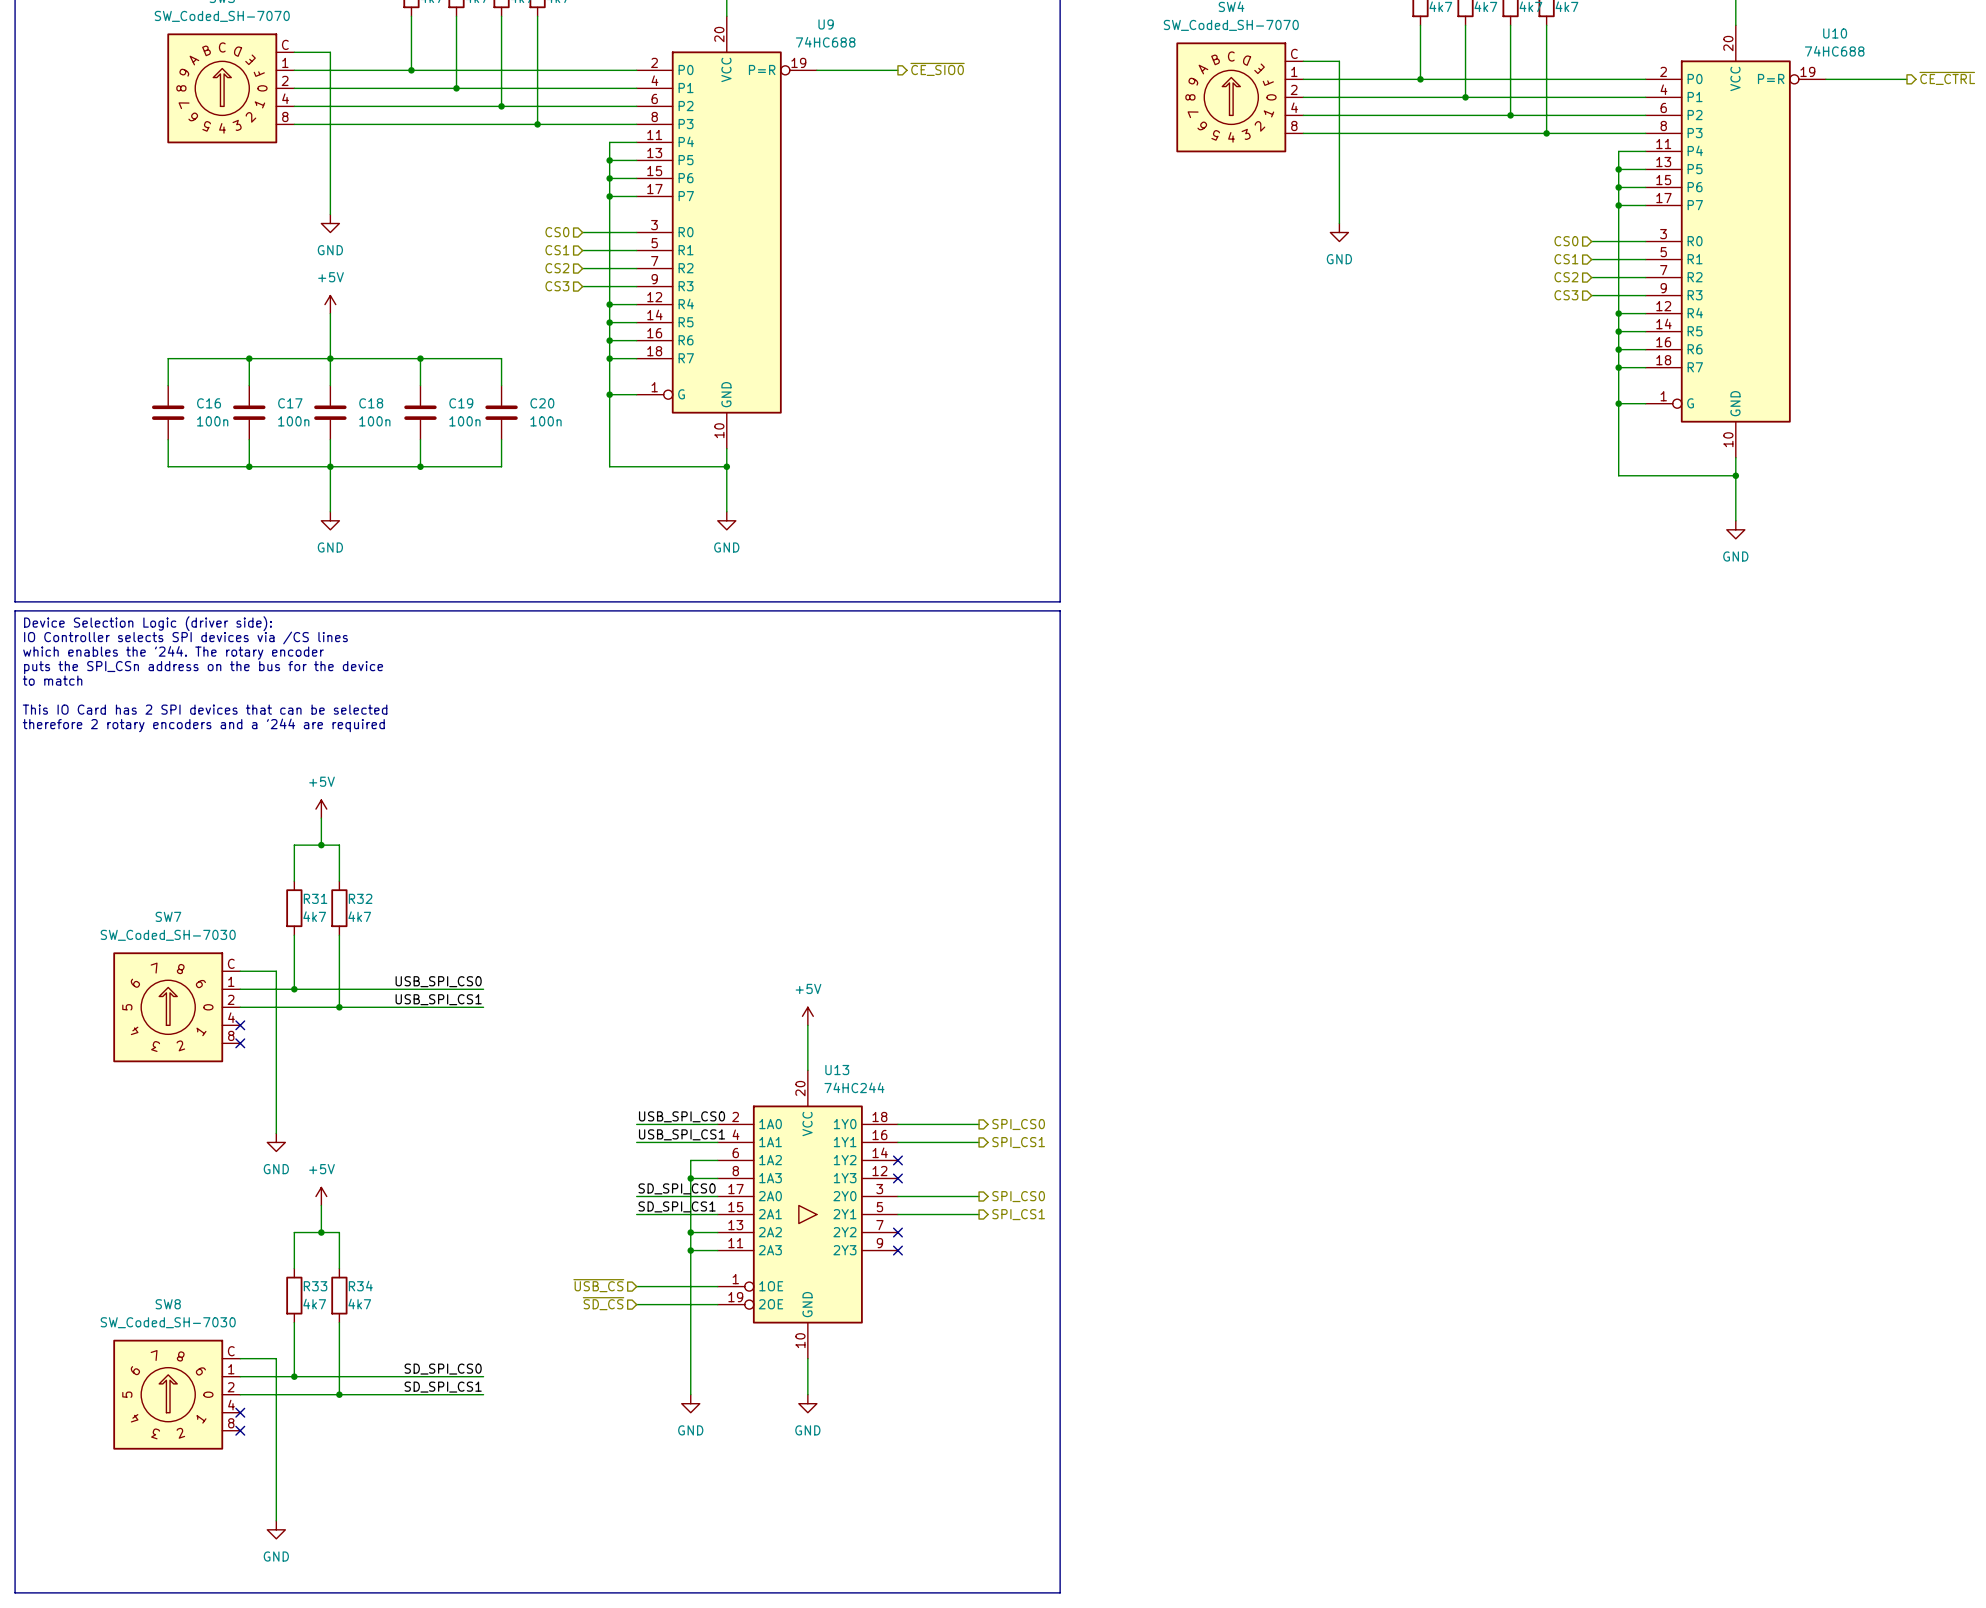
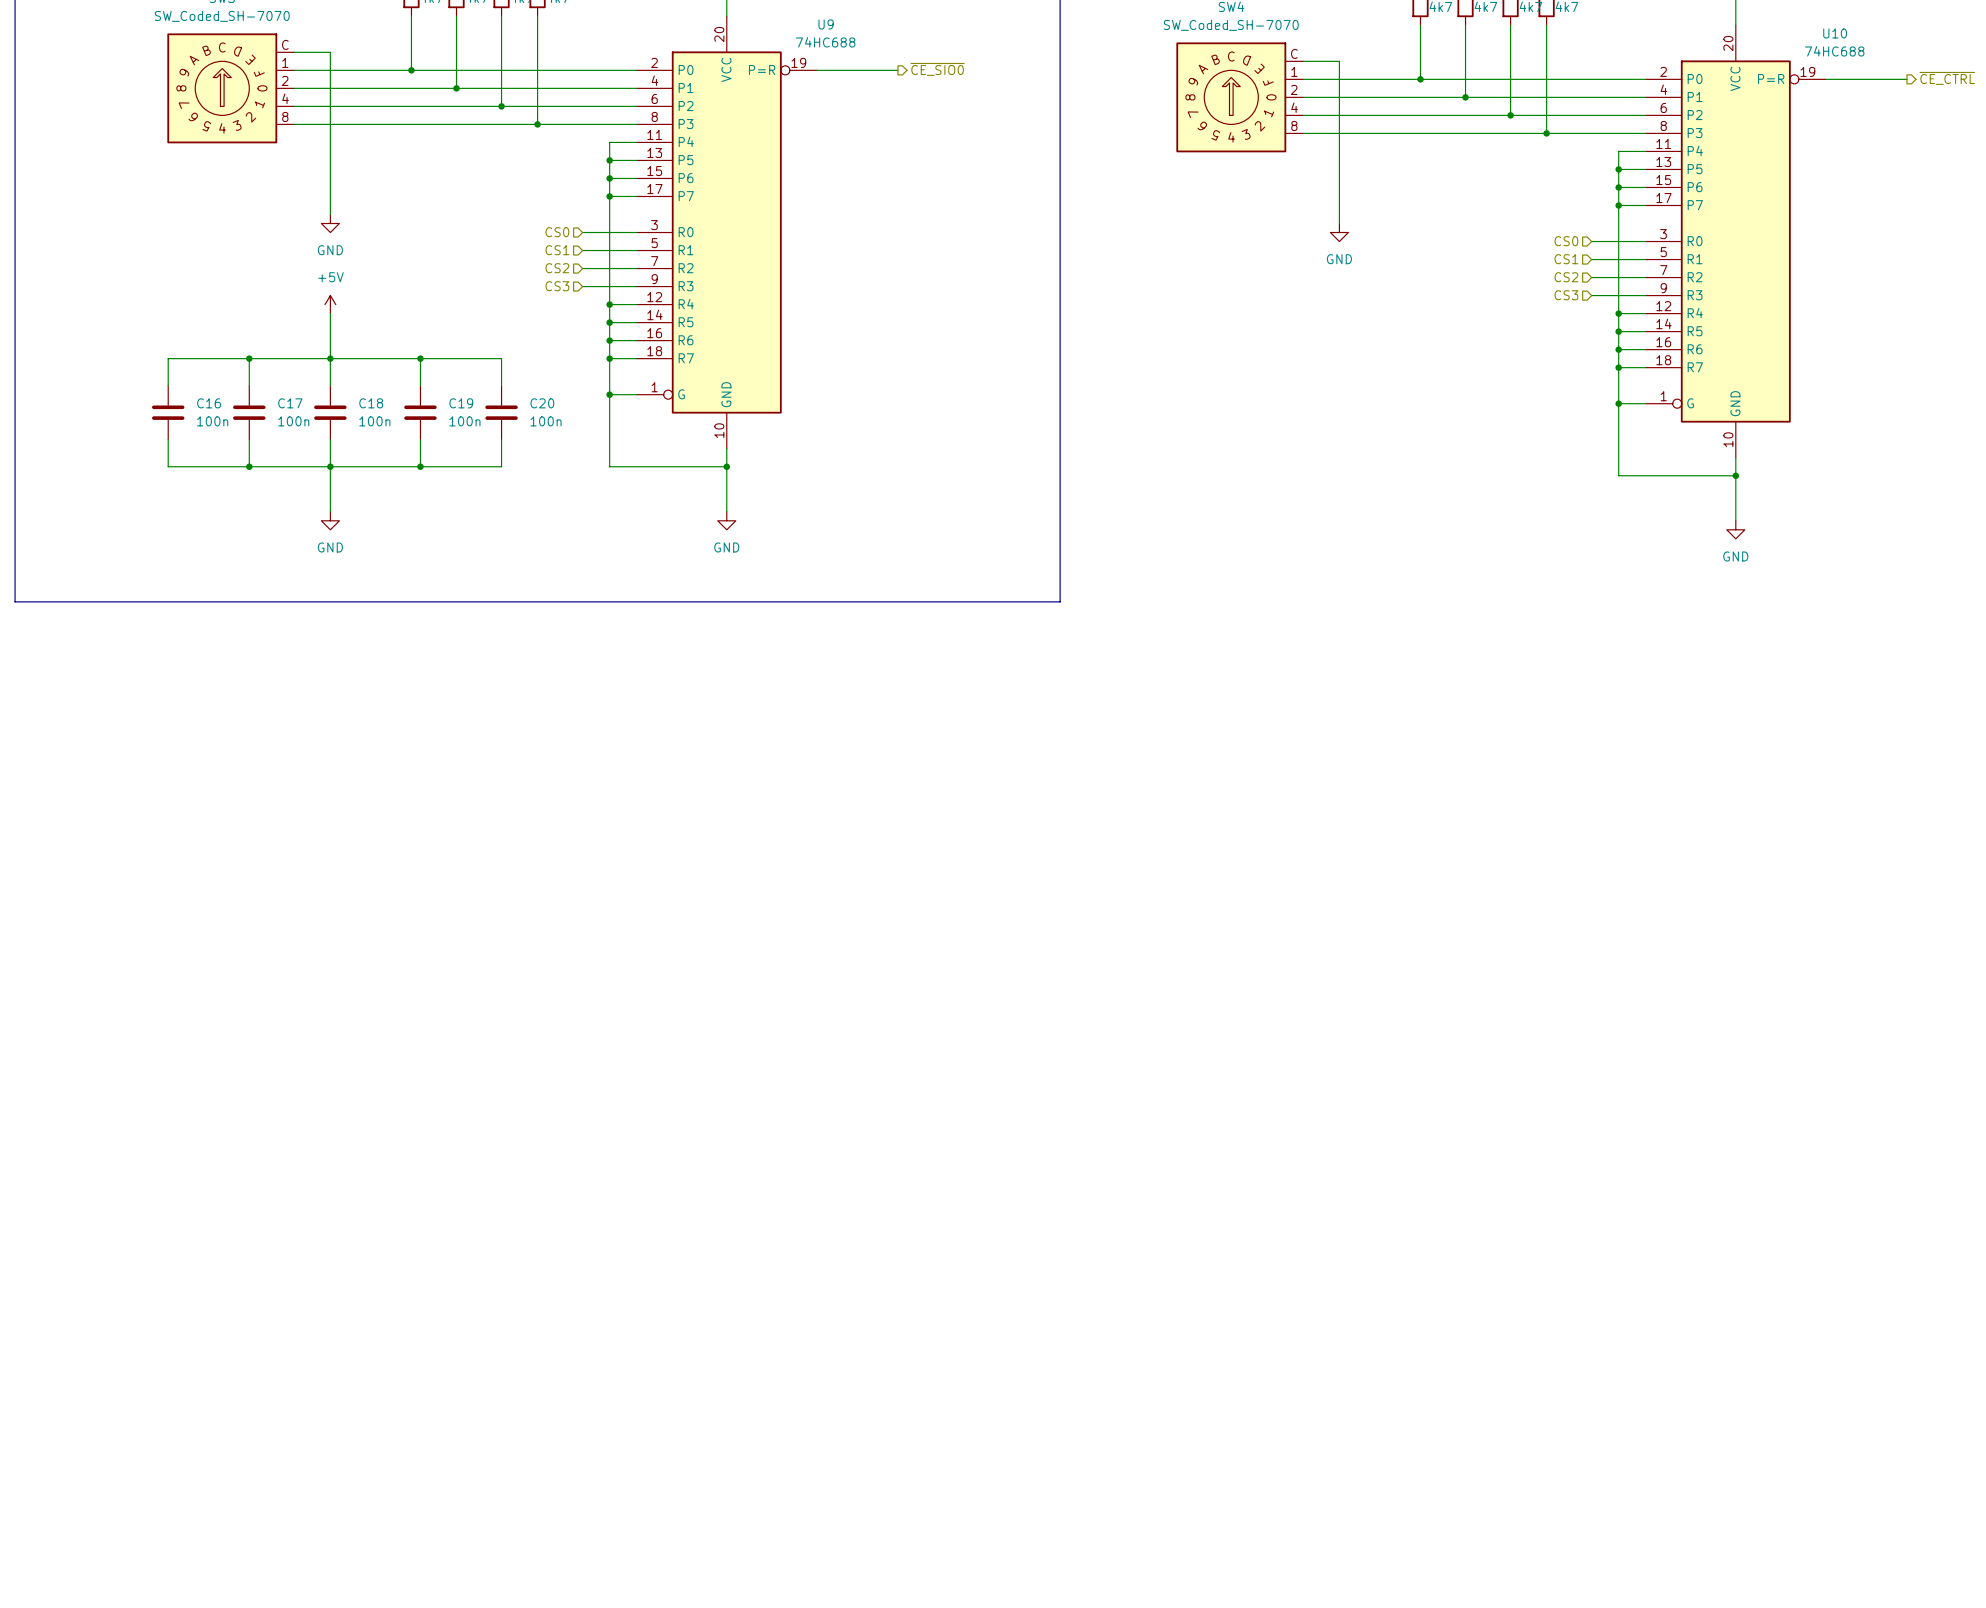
line: (15, 610) (1060, 610) (1060, 1592) (15, 1592) (15, 610) -> none
text: Device Selection Logic (driver side): (148, 623) -> none
text: IO Controller selects SPI devices via /CS lines (185, 637) -> none
text: which enables the '244. The rotary encoder (173, 652) -> none
text: puts the SPI_CSn address on the bus for the device (203, 667) -> none
text: to match (52, 680) -> none
text: This IO Card has 2 SPI devices that can be selected (205, 709) -> none
text: therefore 2 rotary encoders and a '244 are required (203, 725) -> none
power symbol: +5V (321, 809) -> none
wire: (321, 818) (321, 845) -> none
junction: (321, 845) -> none
wire: (294, 881) (294, 845) (339, 845) (339, 881) -> none
R31: 4k7 (294, 908) -> none
R32: 4k7 (339, 908) -> none
wire: (294, 935) (294, 989) -> none
wire: (339, 935) (339, 1007) -> none
wire: (240, 971) (276, 971) (276, 1133) -> none
label: USB_SPI_CS0 (438, 981) -> none
wire: (240, 989) (483, 989) -> none
junction: (294, 989) -> none
label: USB_SPI_CS1 (438, 999) -> none
SW7: SW_Coded_SH-7030 (176, 1007) -> none
wire: (240, 1007) (483, 1007) -> none
junction: (339, 1007) -> none
power symbol: +5V (807, 1016) -> none
no-connect mark: (240, 1025) -> none
wire: (807, 1025) (807, 1070) -> none
no-connect mark: (240, 1043) -> none
label: USB_SPI_CS0 (682, 1116) -> none
wire: (636, 1124) (717, 1124) -> none
wire: (897, 1124) (979, 1124) -> none
hierarchical label: SPI_CS0 (1018, 1124) -> none
label: USB_SPI_CS1 (682, 1134) -> none
power symbol: GND (276, 1142) -> none
wire: (636, 1142) (717, 1142) -> none
wire: (897, 1142) (979, 1142) -> none
hierarchical label: SPI_CS1 (1018, 1142) -> none
wire: (717, 1160) (690, 1160) (690, 1394) -> none
no-connect mark: (897, 1160) -> none
wire: (690, 1178) (717, 1178) -> none
junction: (690, 1178) -> none
no-connect mark: (897, 1178) -> none
label: SD_SPI_CS0 (677, 1188) -> none
power symbol: +5V (321, 1196) -> none
wire: (636, 1196) (717, 1196) -> none
wire: (897, 1196) (979, 1196) -> none
hierarchical label: SPI_CS0 (1018, 1196) -> none
wire: (321, 1205) (321, 1232) -> none
label: SD_SPI_CS1 (677, 1206) -> none
wire: (636, 1214) (717, 1214) -> none
U13: 74HC244 (807, 1214) -> none
wire: (897, 1214) (979, 1214) -> none
hierarchical label: SPI_CS1 (1018, 1214) -> none
junction: (321, 1232) -> none
wire: (690, 1232) (717, 1232) -> none
junction: (690, 1232) -> none
no-connect mark: (897, 1232) -> none
wire: (690, 1250) (717, 1250) -> none
junction: (690, 1250) -> none
no-connect mark: (897, 1250) -> none
wire: (294, 1268) (294, 1232) (339, 1232) (339, 1268) -> none
hierarchical label: ~{USB_CS} (598, 1285) -> none
wire: (636, 1286) (717, 1286) -> none
R33: 4k7 (294, 1295) -> none
R34: 4k7 (339, 1295) -> none
hierarchical label: ~{SD_CS} (603, 1303) -> none
wire: (636, 1304) (717, 1304) -> none
wire: (294, 1322) (294, 1376) -> none
wire: (339, 1322) (339, 1394) -> none
wire: (240, 1358) (276, 1358) (276, 1520) -> none
wire: (807, 1358) (807, 1394) -> none
label: SD_SPI_CS0 (443, 1369) -> none
wire: (240, 1376) (483, 1376) -> none
junction: (294, 1376) -> none
label: SD_SPI_CS1 (443, 1387) -> none
SW8: SW_Coded_SH-7030 (176, 1394) -> none
wire: (240, 1394) (483, 1394) -> none
junction: (339, 1394) -> none
power symbol: GND (690, 1403) -> none
power symbol: GND (807, 1403) -> none
no-connect mark: (240, 1412) -> none
no-connect mark: (240, 1430) -> none
power symbol: GND (276, 1529) -> none

